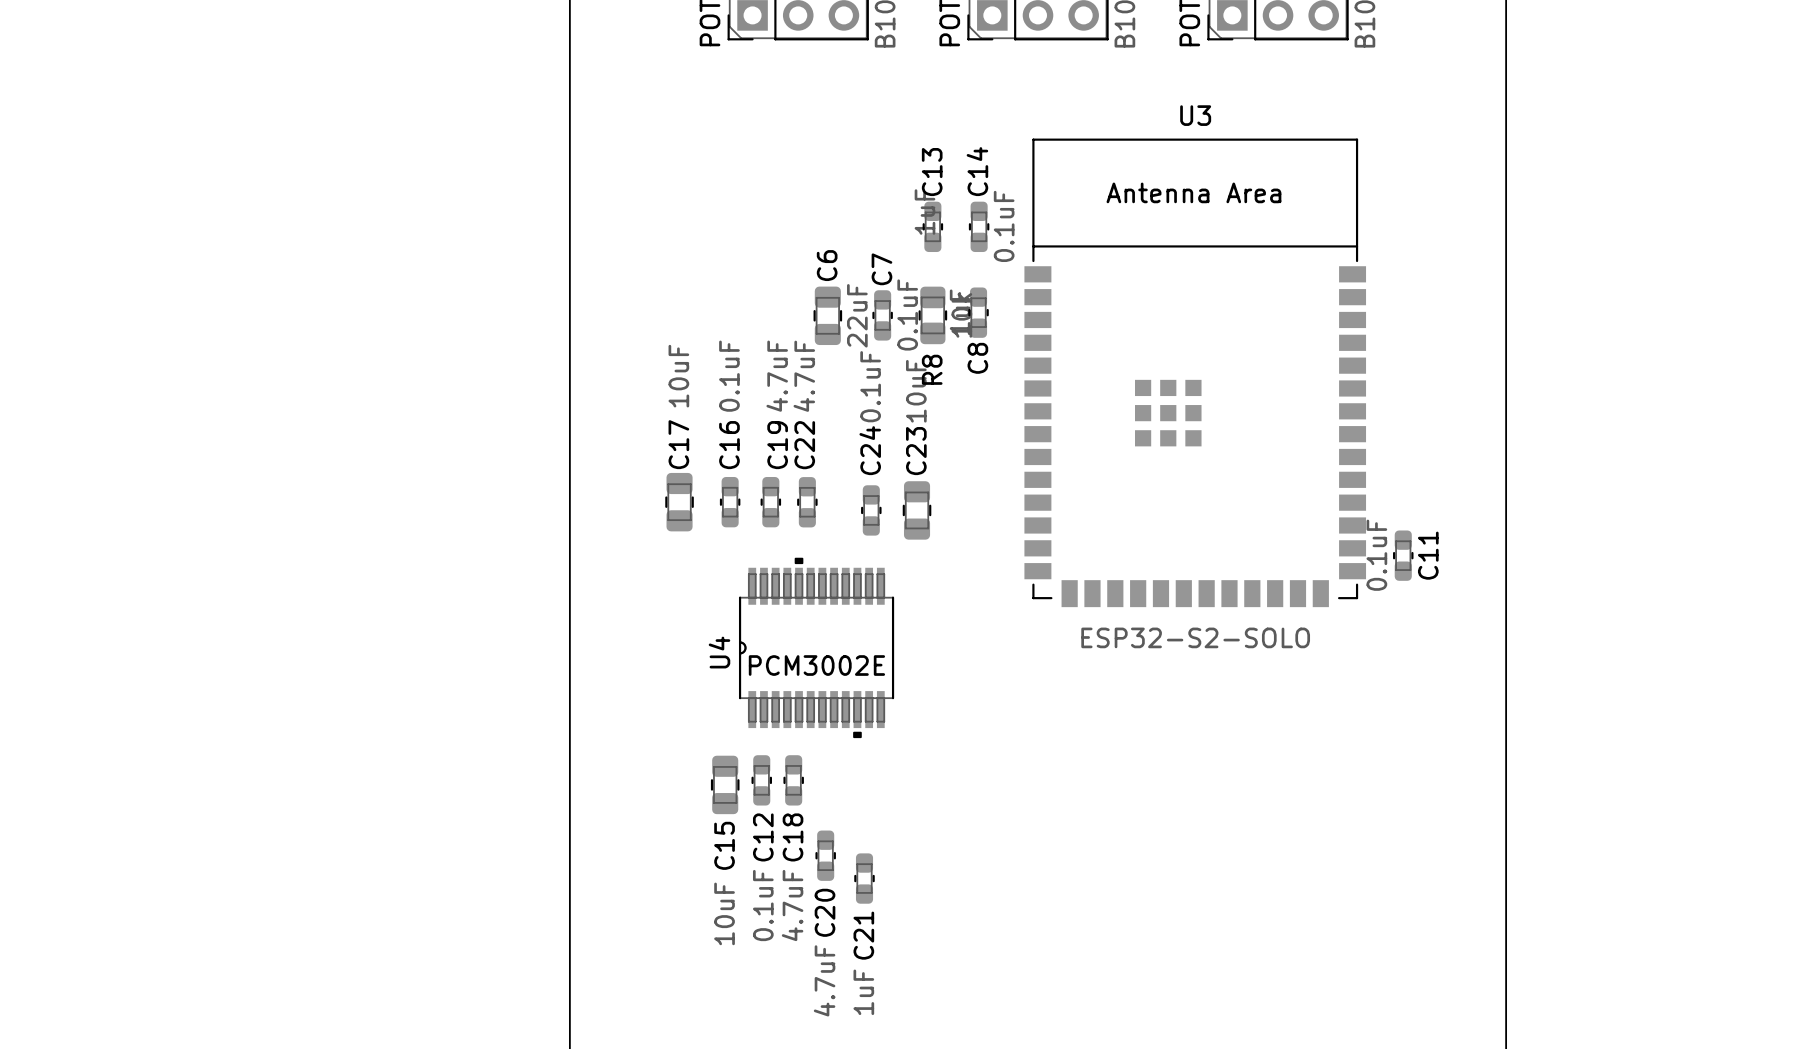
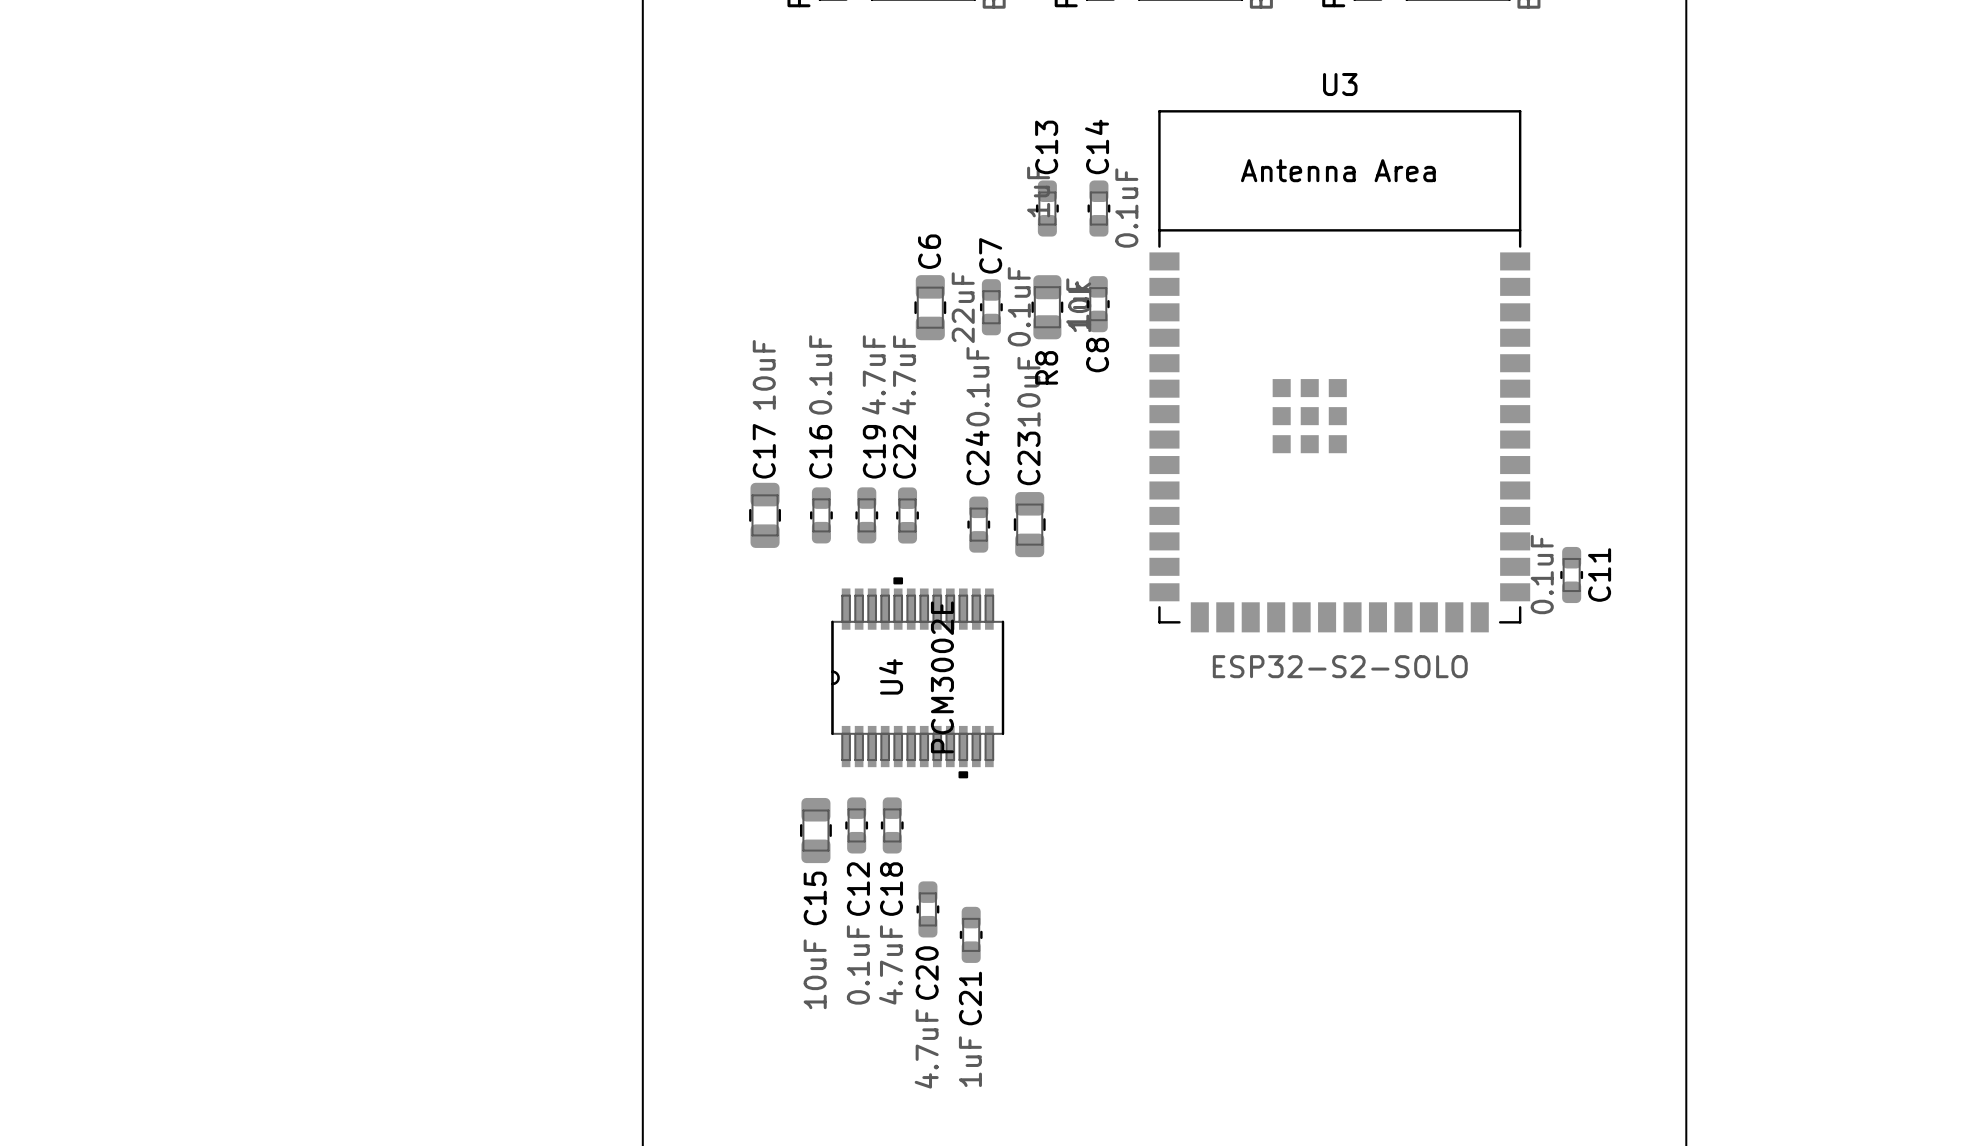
U4 name position: U4 (719, 652) -> U4 (891, 676)
U4 value rotation: 0° (816, 665) -> 90° counterclockwise (942, 677)

